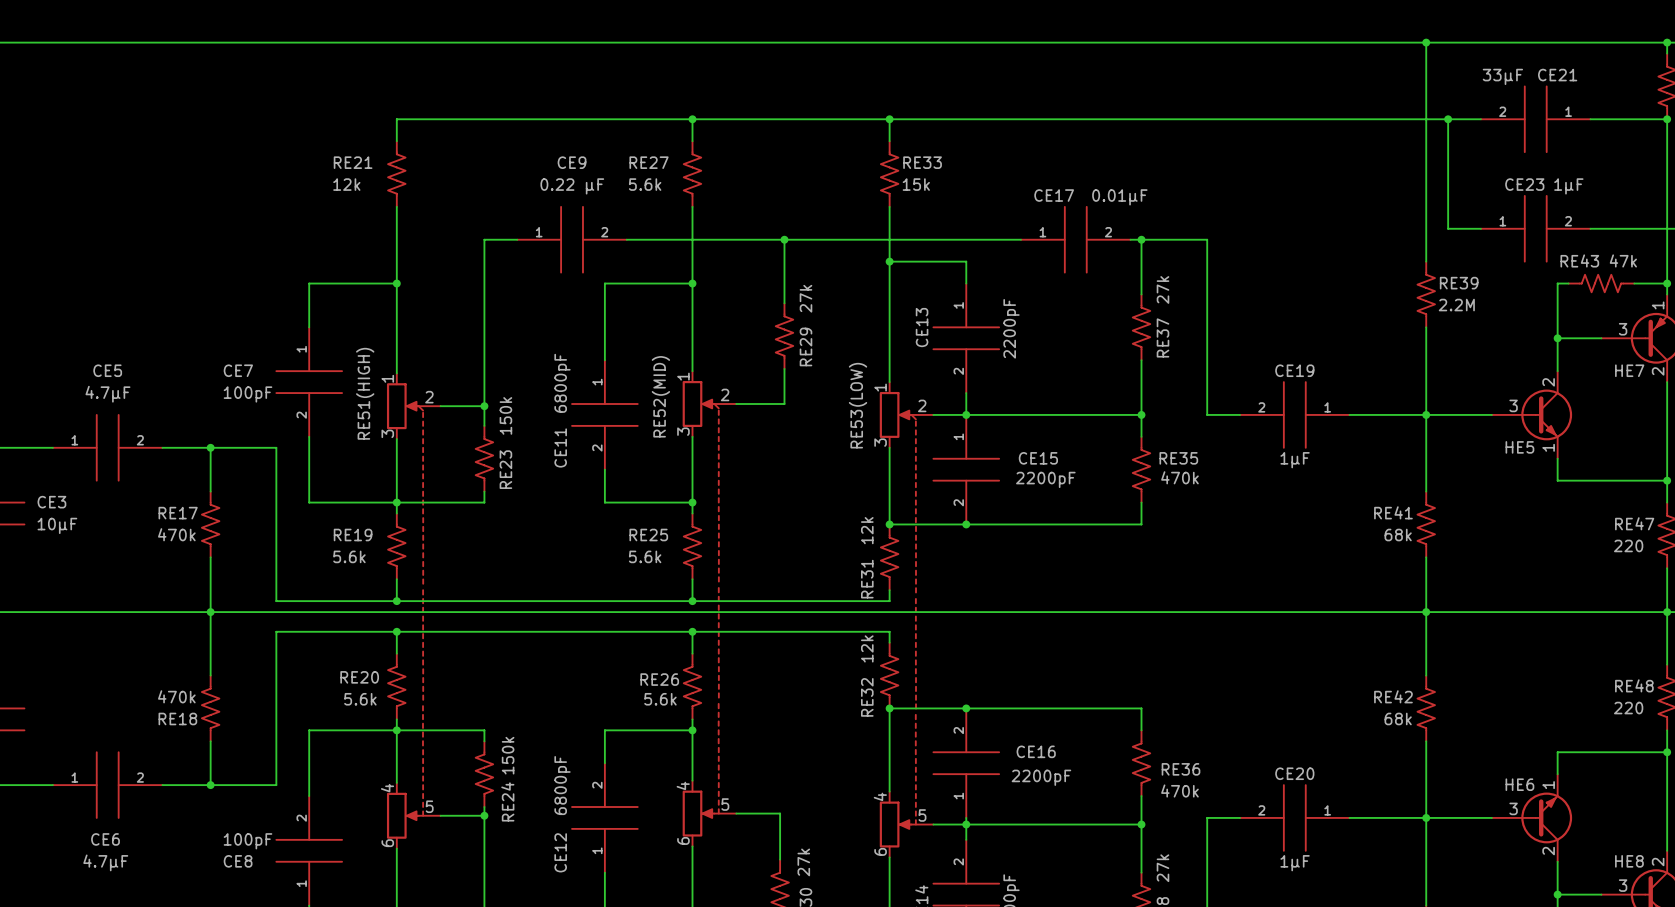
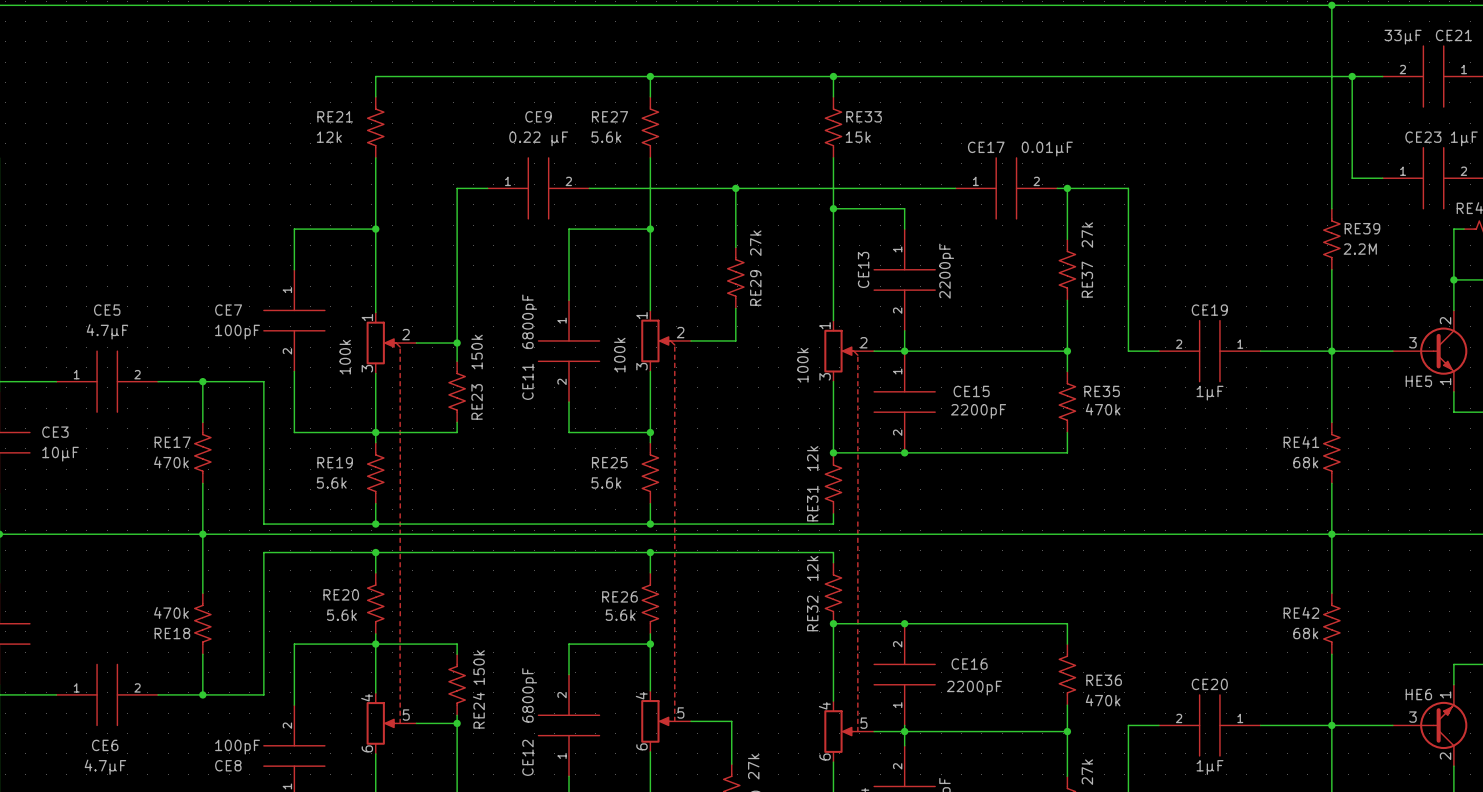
part value: RE51(HIGH) (365, 393) -> 100k (345, 357)
part value: RE52(MID) (660, 396) -> 100k (619, 355)
part value: RE53(LOW) (858, 405) -> 100k (802, 365)

